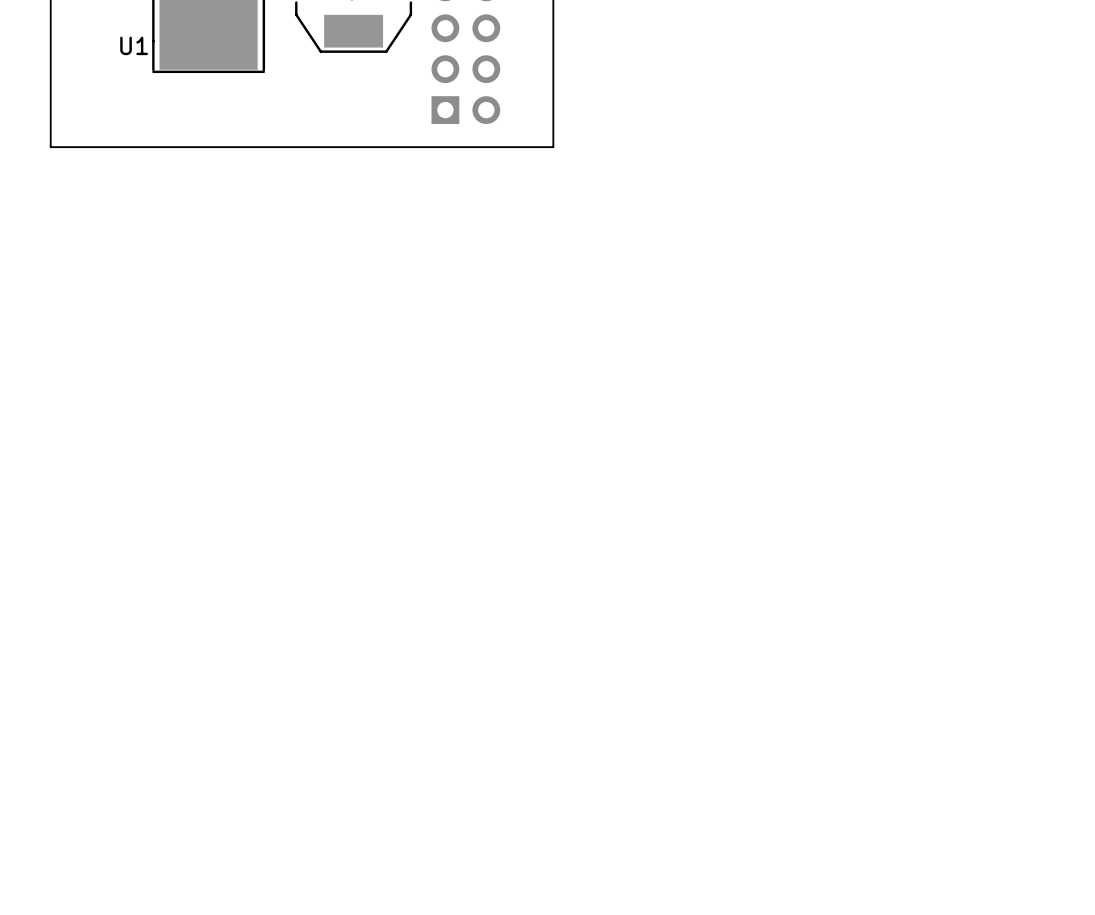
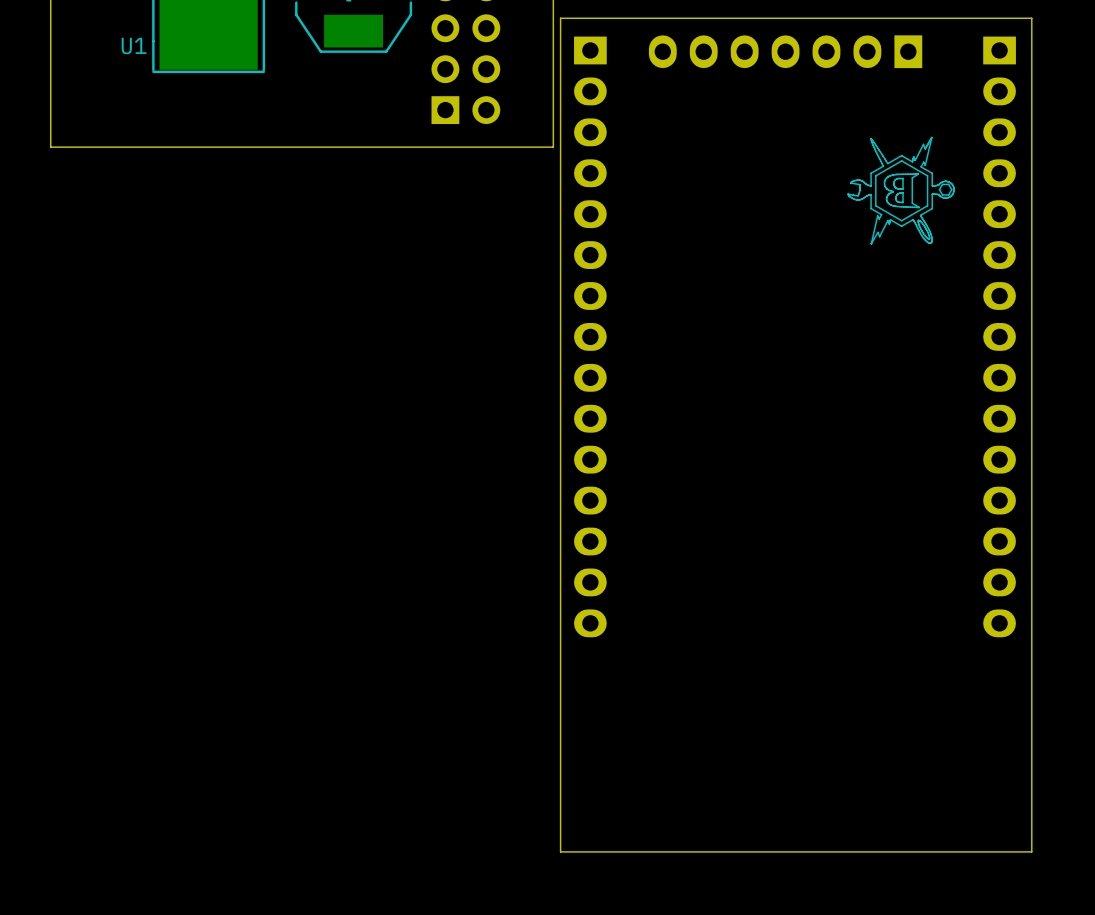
board edge: none -> (1031, 18) (560, 18) (560, 851) (1031, 851) (1031, 18)
part: none -> (785, 51)
drawing: none -> [847, 137, 955, 245]
part: none -> (590, 336)
part: none -> (999, 336)

